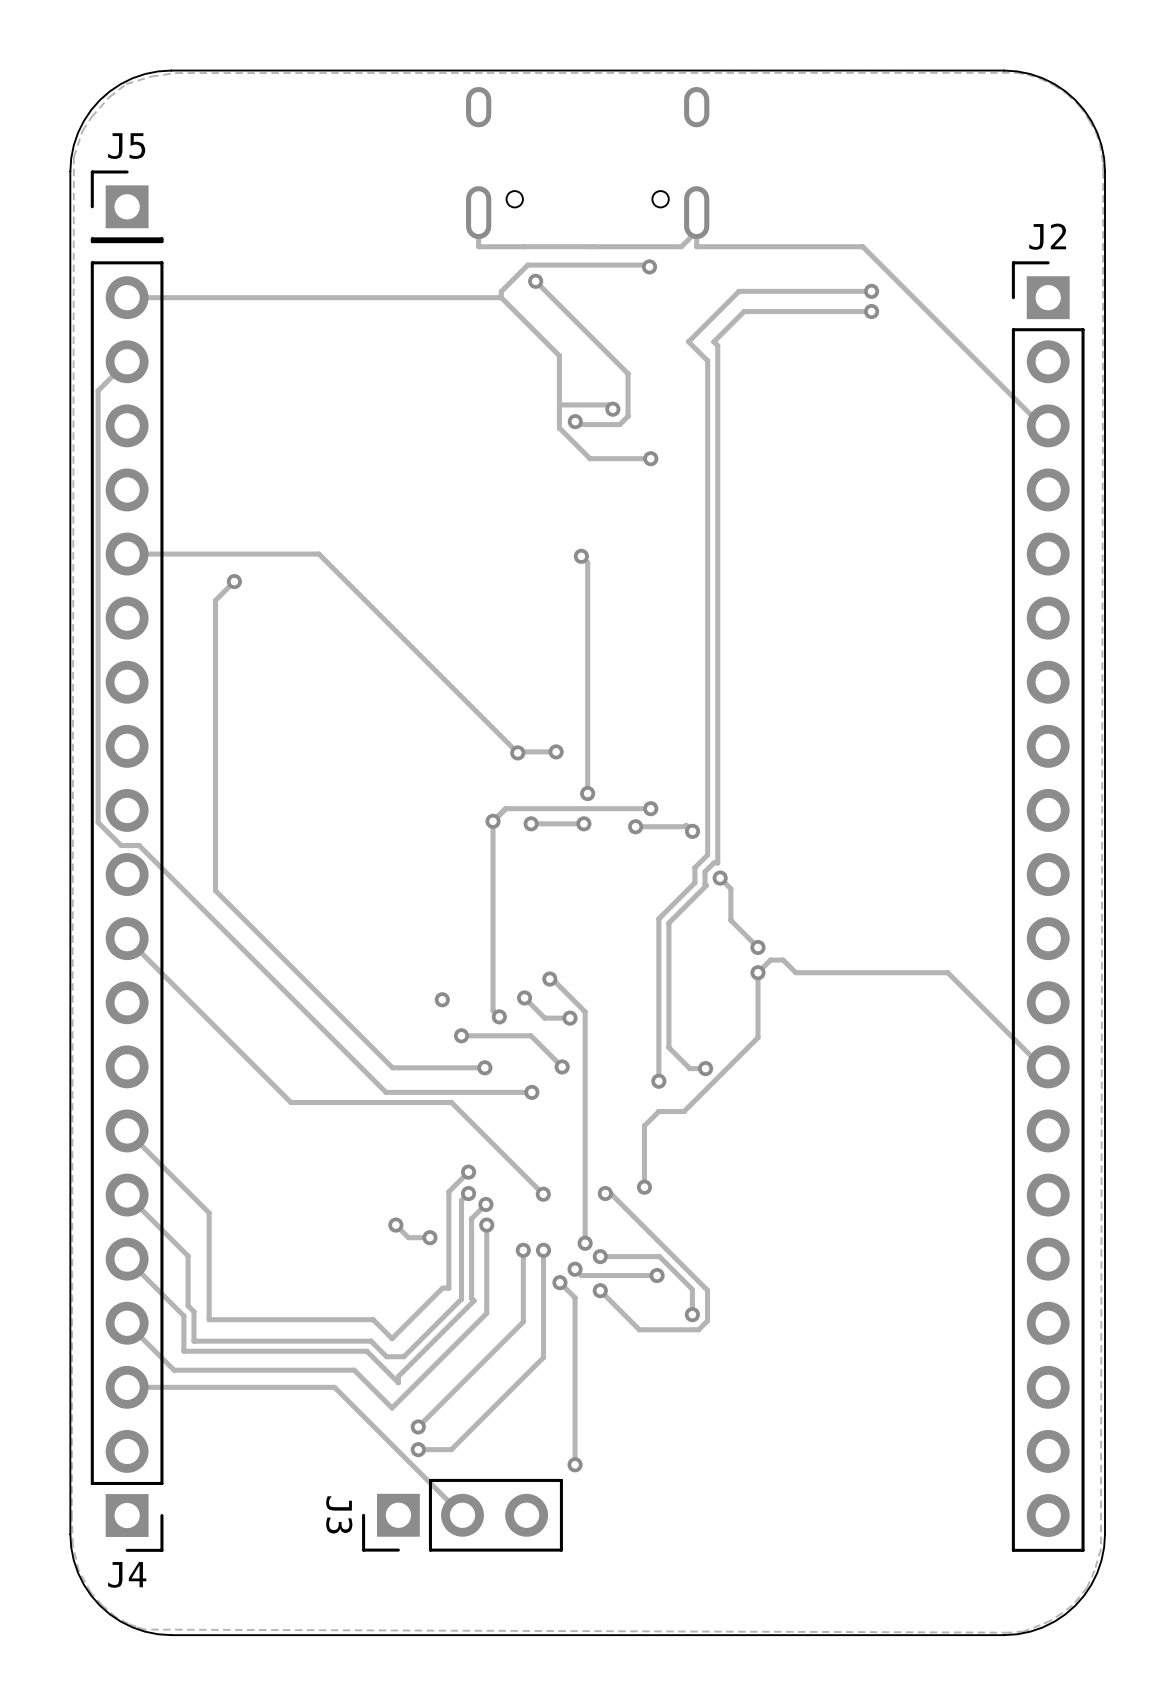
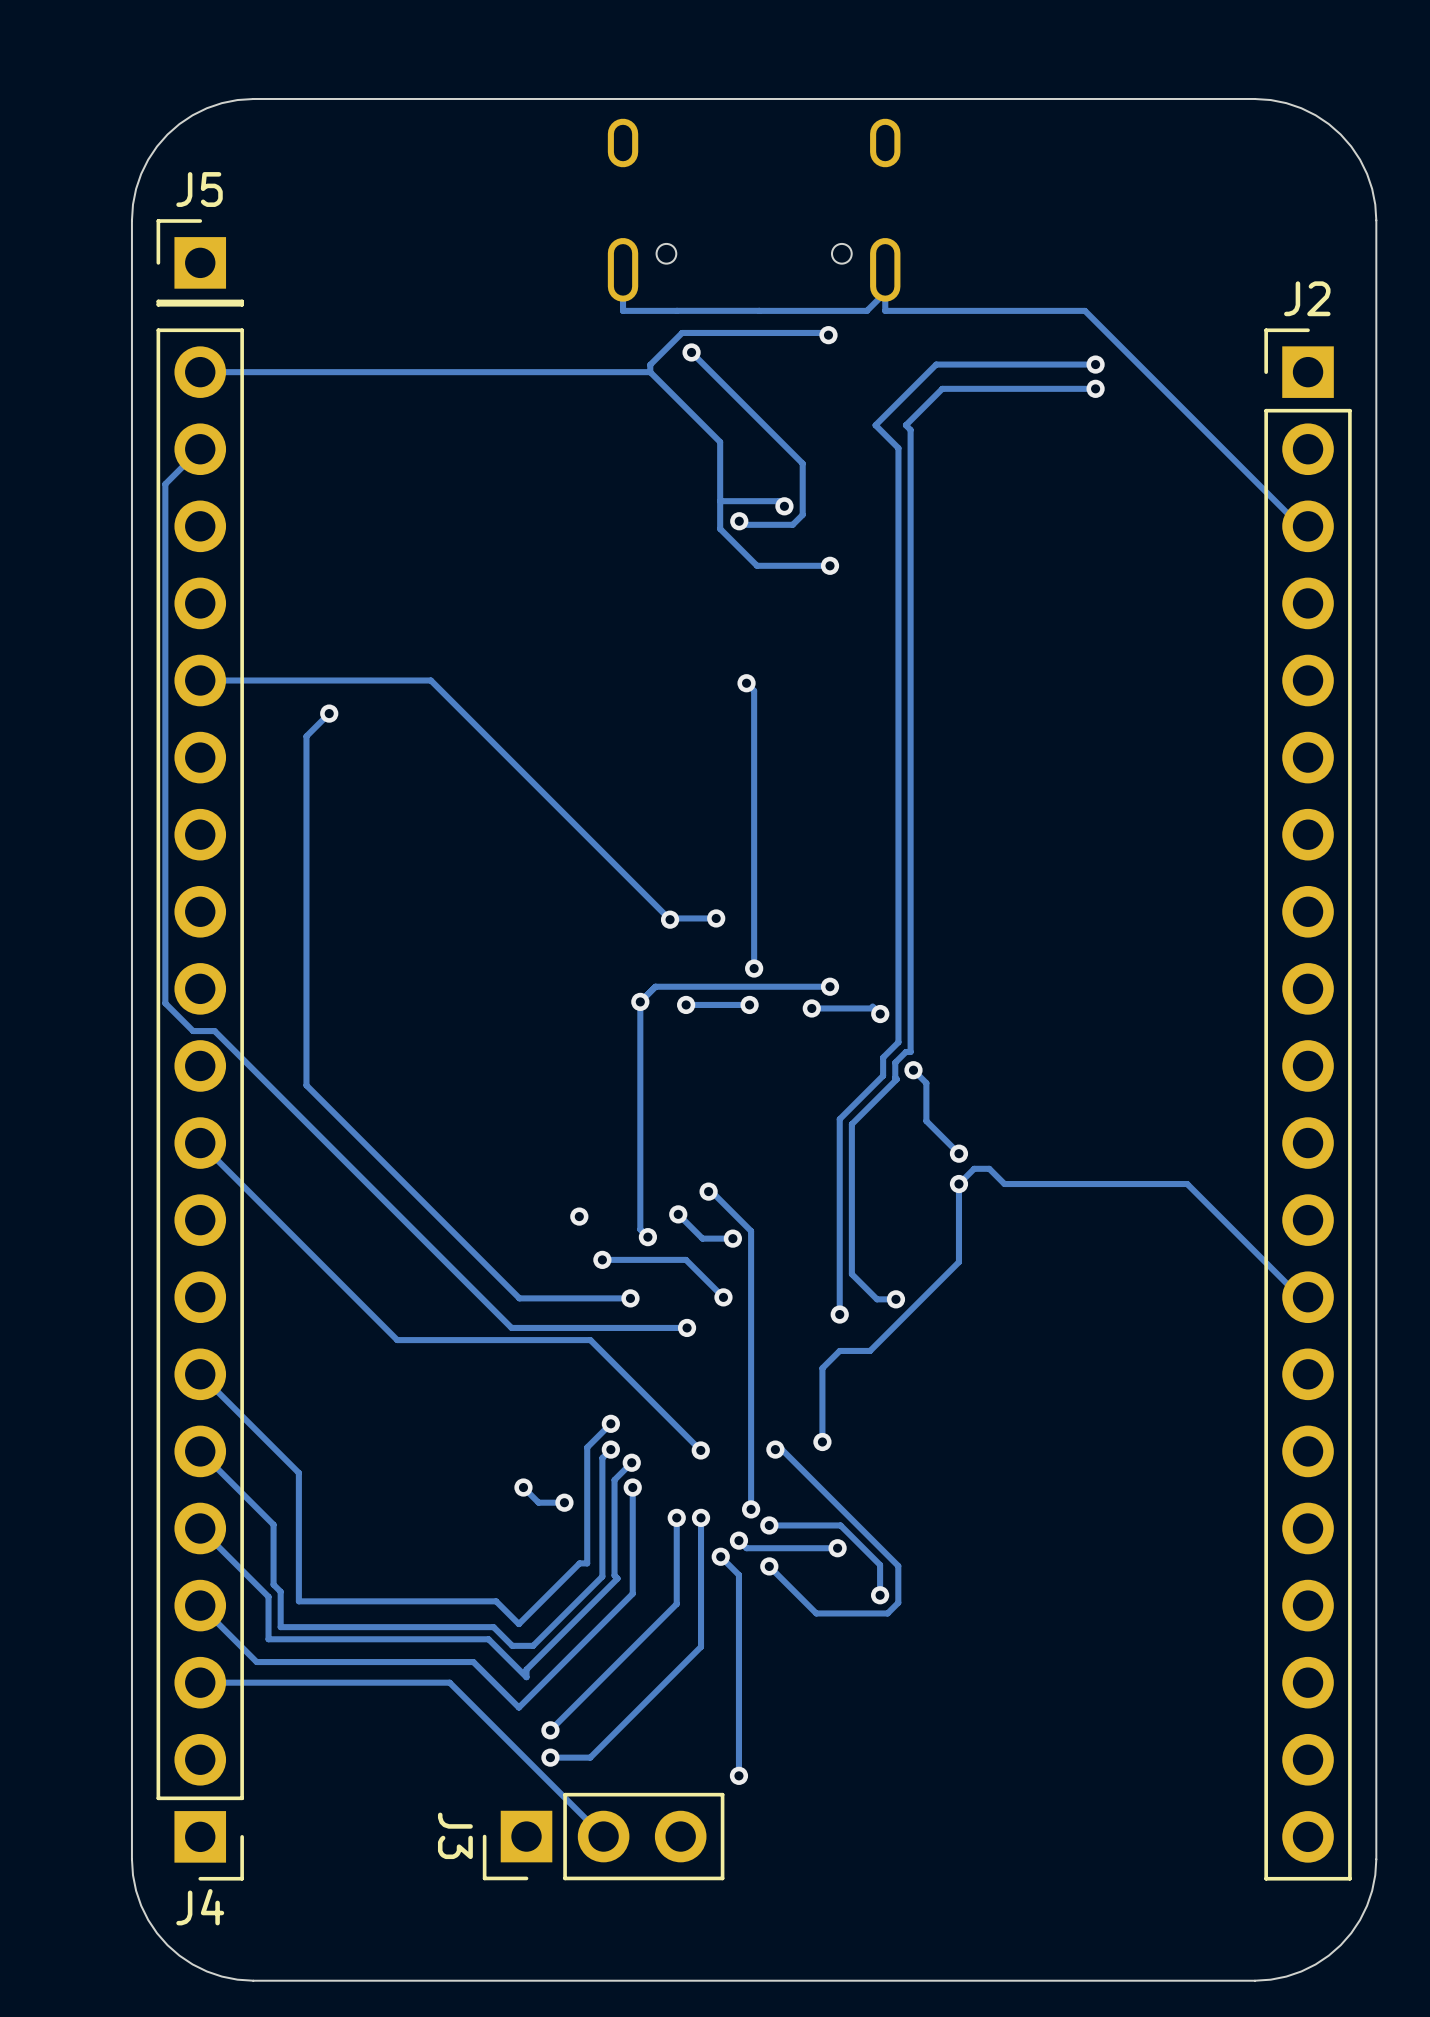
zone outline: (1016, 72) (175, 73) (151, 76) (126, 84) (109, 97) (82, 131) (73, 157) (71, 1517) (72, 1545) (78, 1571) (91, 1592) (116, 1617) (144, 1629) (1009, 1632) (1024, 1631) (1050, 1620) (1072, 1605) (1087, 1587) (1100, 1549) (1103, 164) (1095, 132) (1079, 105) (1053, 84) (1039, 78) (1016, 72) -> none

